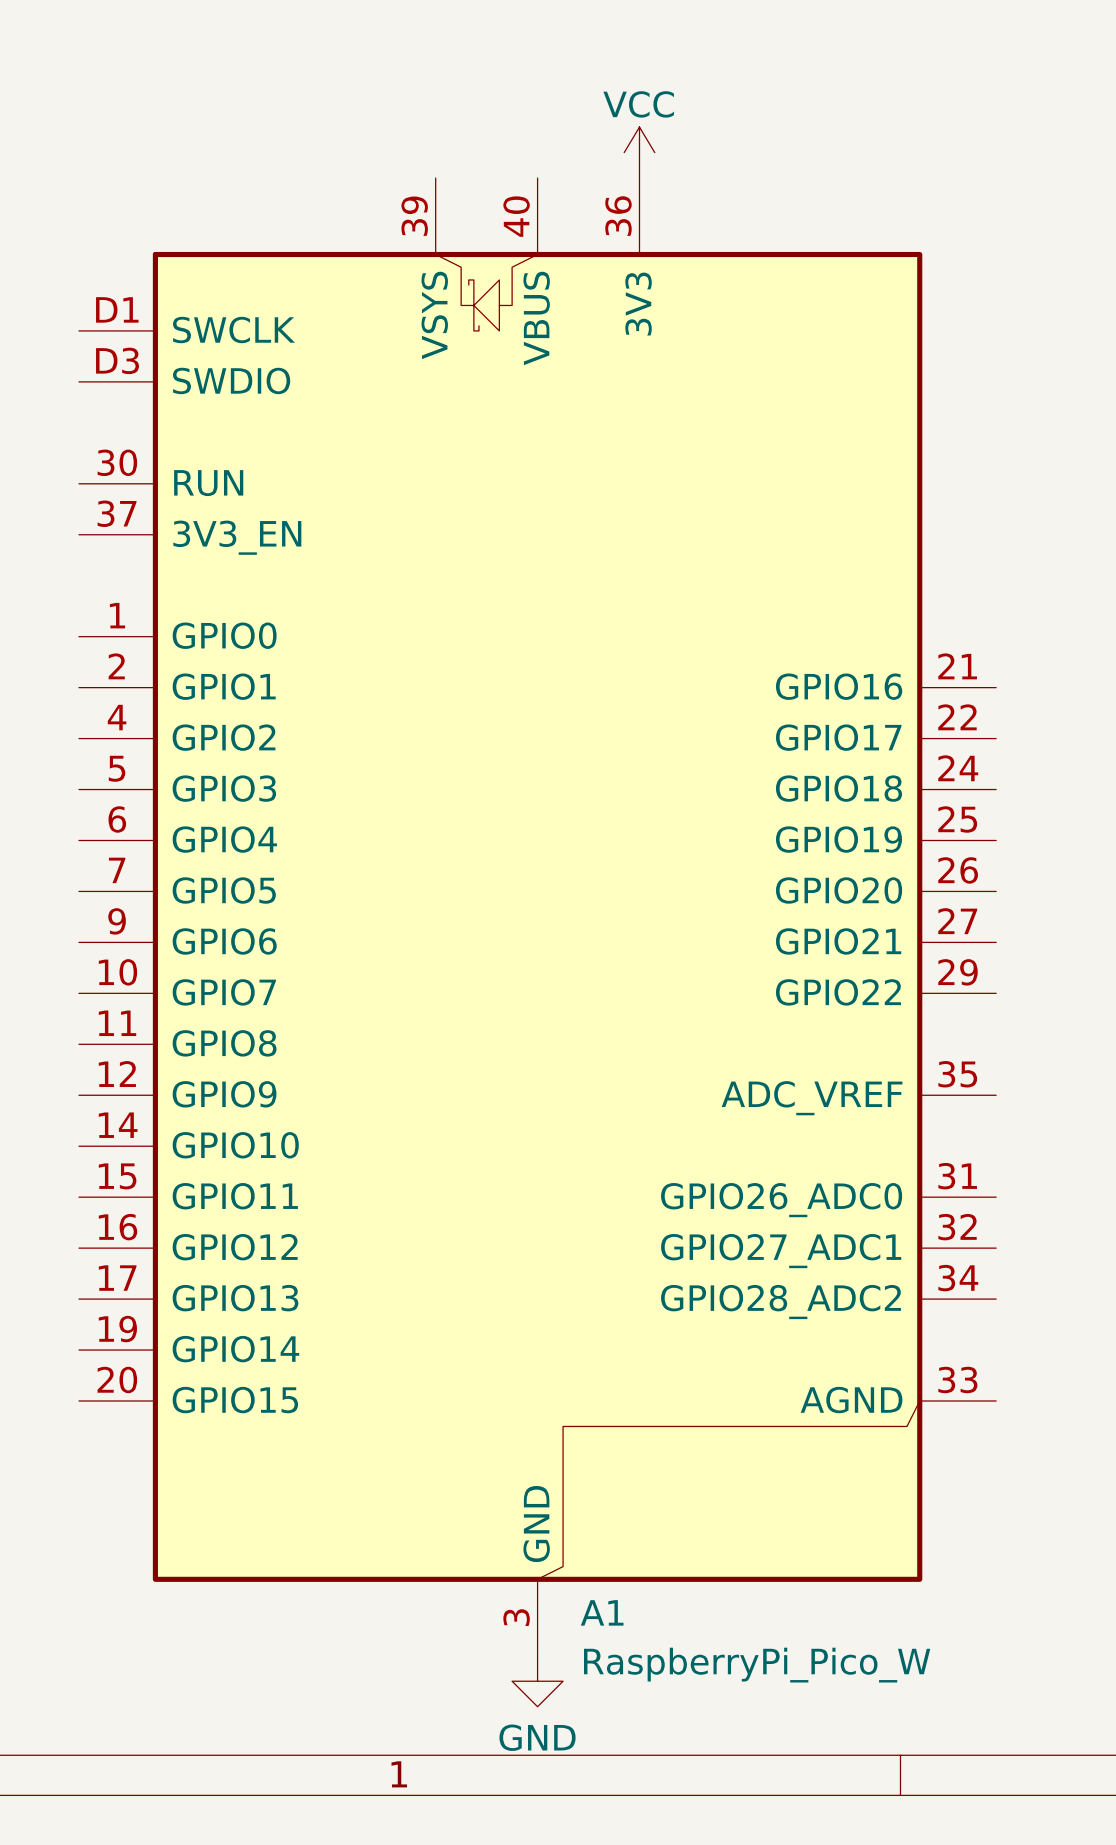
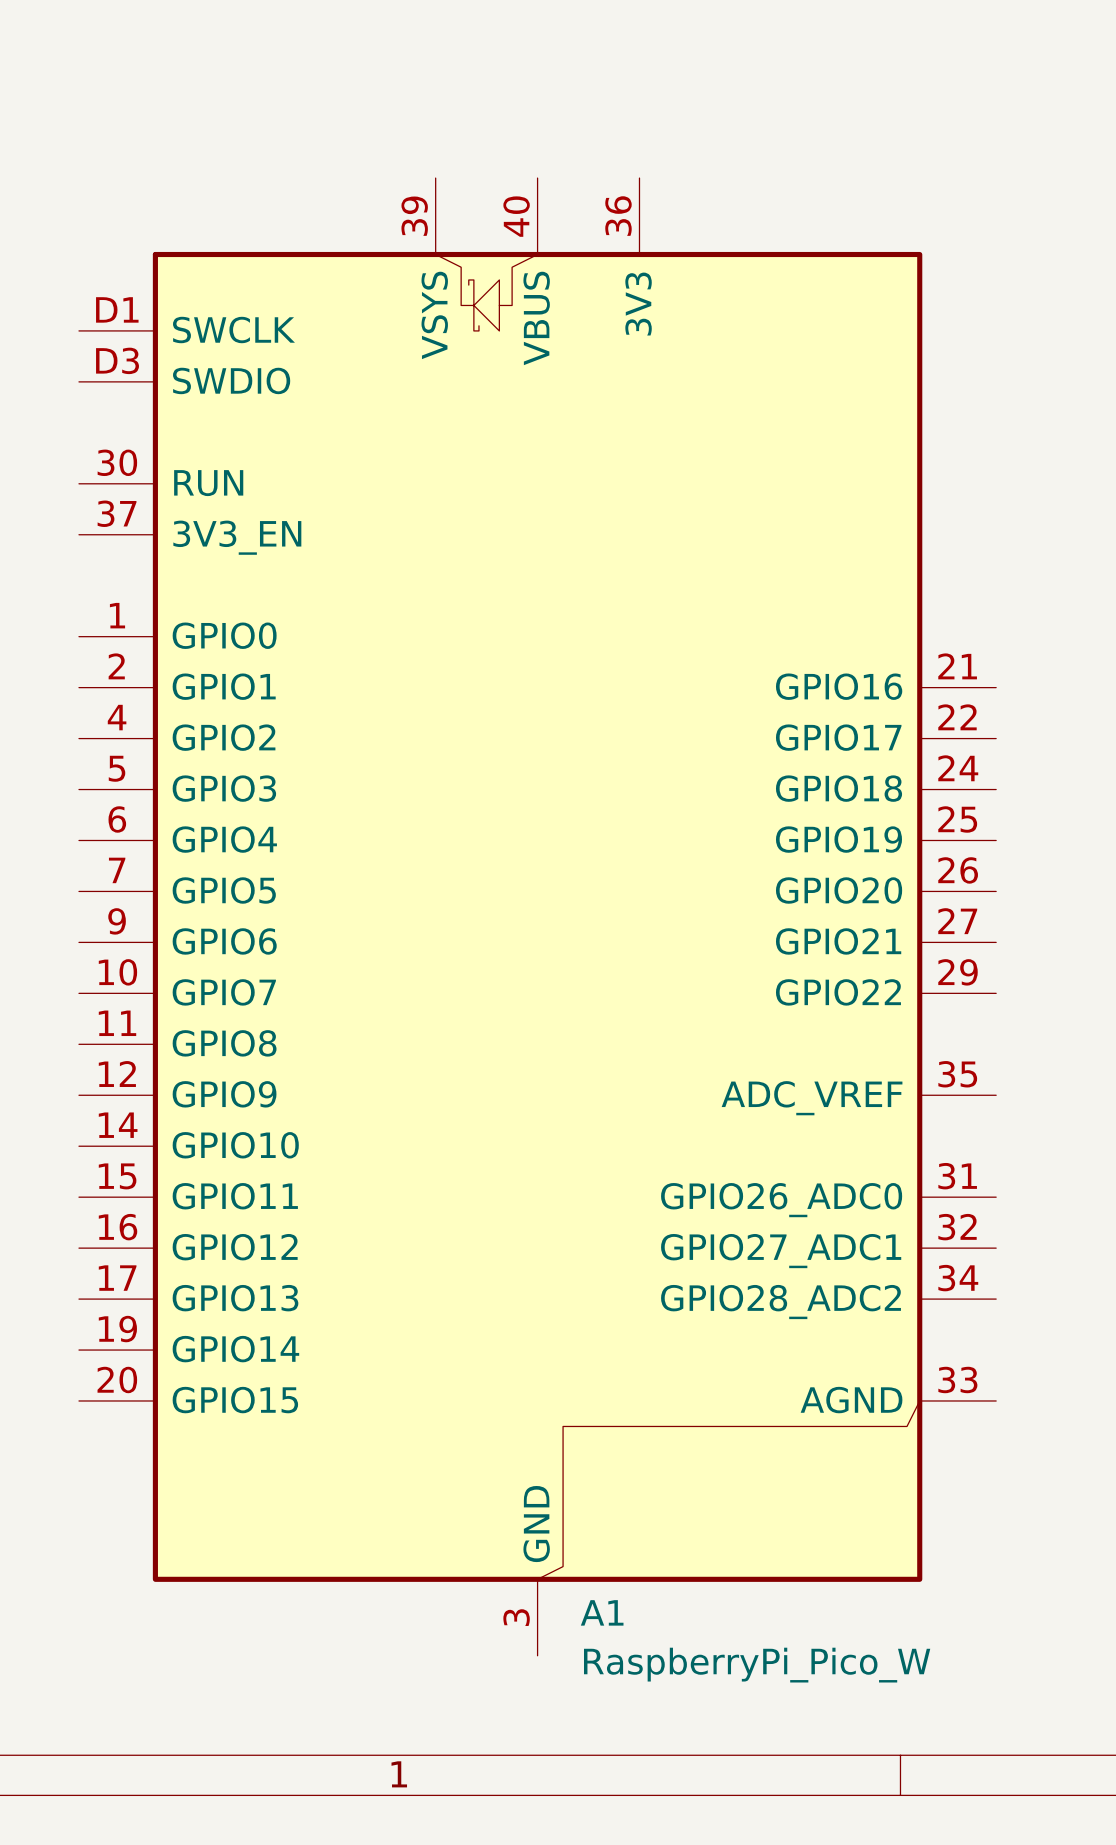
power symbol: VCC (639, 152) -> none
power symbol: GND (537, 1681) -> none

